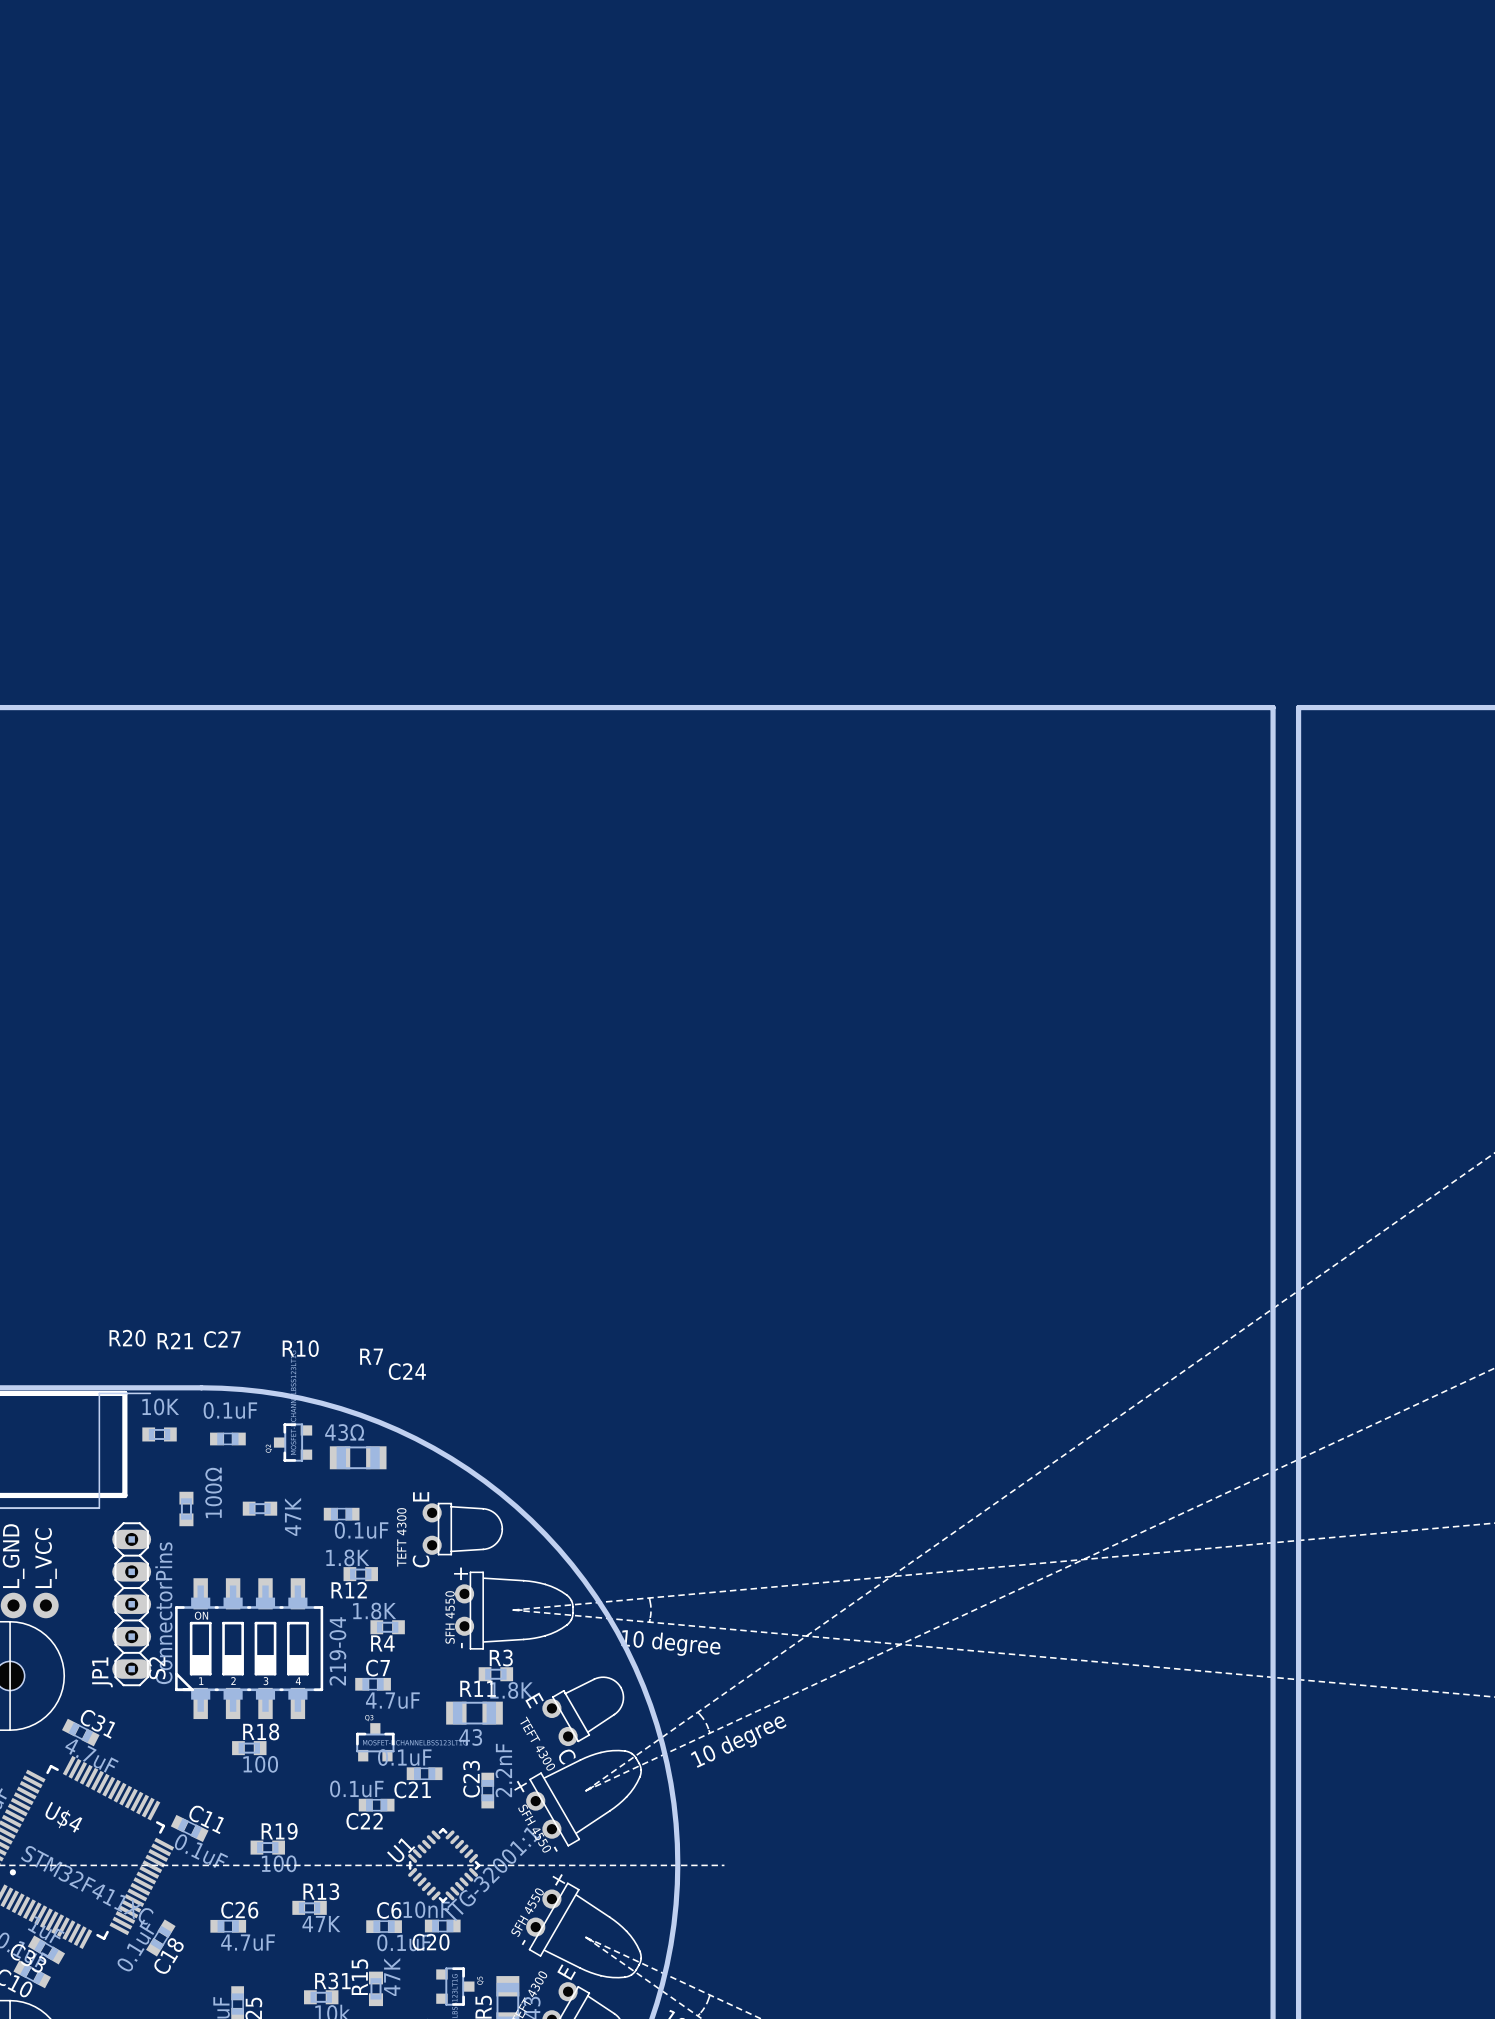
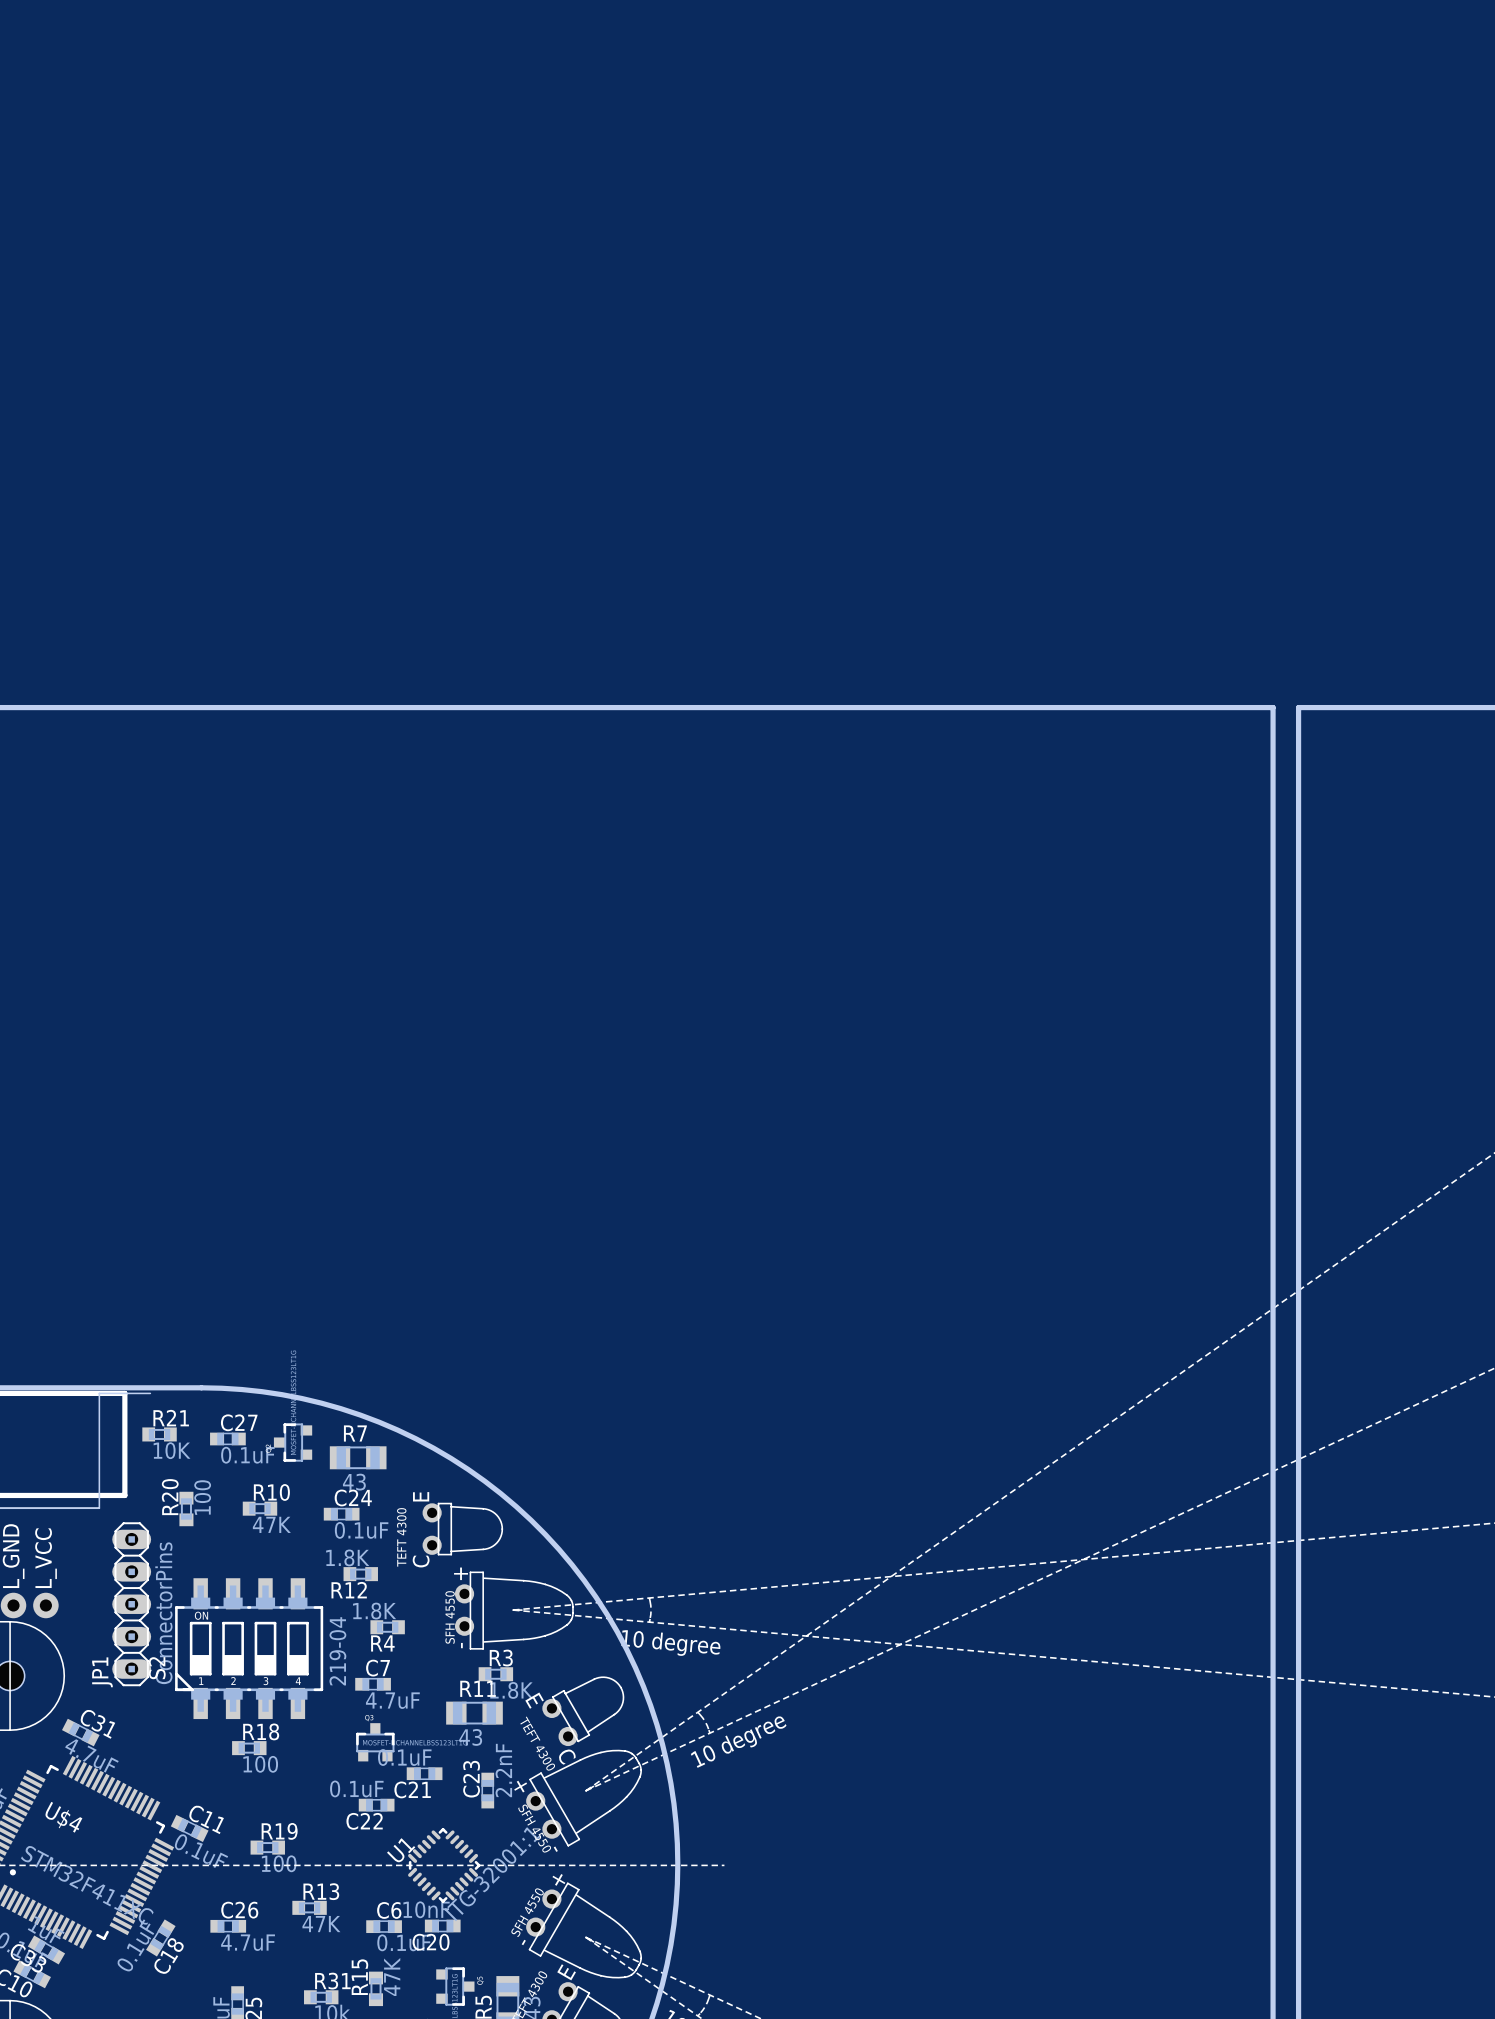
R20 name rotation: 0° (127, 1338) -> 90° counterclockwise (170, 1497)
R20 name position: R20 (127, 1338) -> R20 (170, 1497)
C27 name position: C27 (222, 1339) -> C27 (239, 1422)
R21 name position: R21 (175, 1341) -> R21 (171, 1418)
R10 name position: R10 (300, 1348) -> R10 (271, 1492)
R7 name position: R7 (371, 1356) -> R7 (355, 1433)
C24 name position: C24 (407, 1371) -> C24 (353, 1497)
R21 value position: 10K (160, 1406) -> 10K (172, 1450)
C27 value position: 0.1uF (230, 1410) -> 0.1uF (247, 1455)
R7 value: 43Ω (344, 1432) -> 43 (354, 1482)
R20 value: 100Ω (213, 1492) -> 100 (202, 1497)
R10 value rotation: 0° (293, 1516) -> 90° clockwise (271, 1524)

